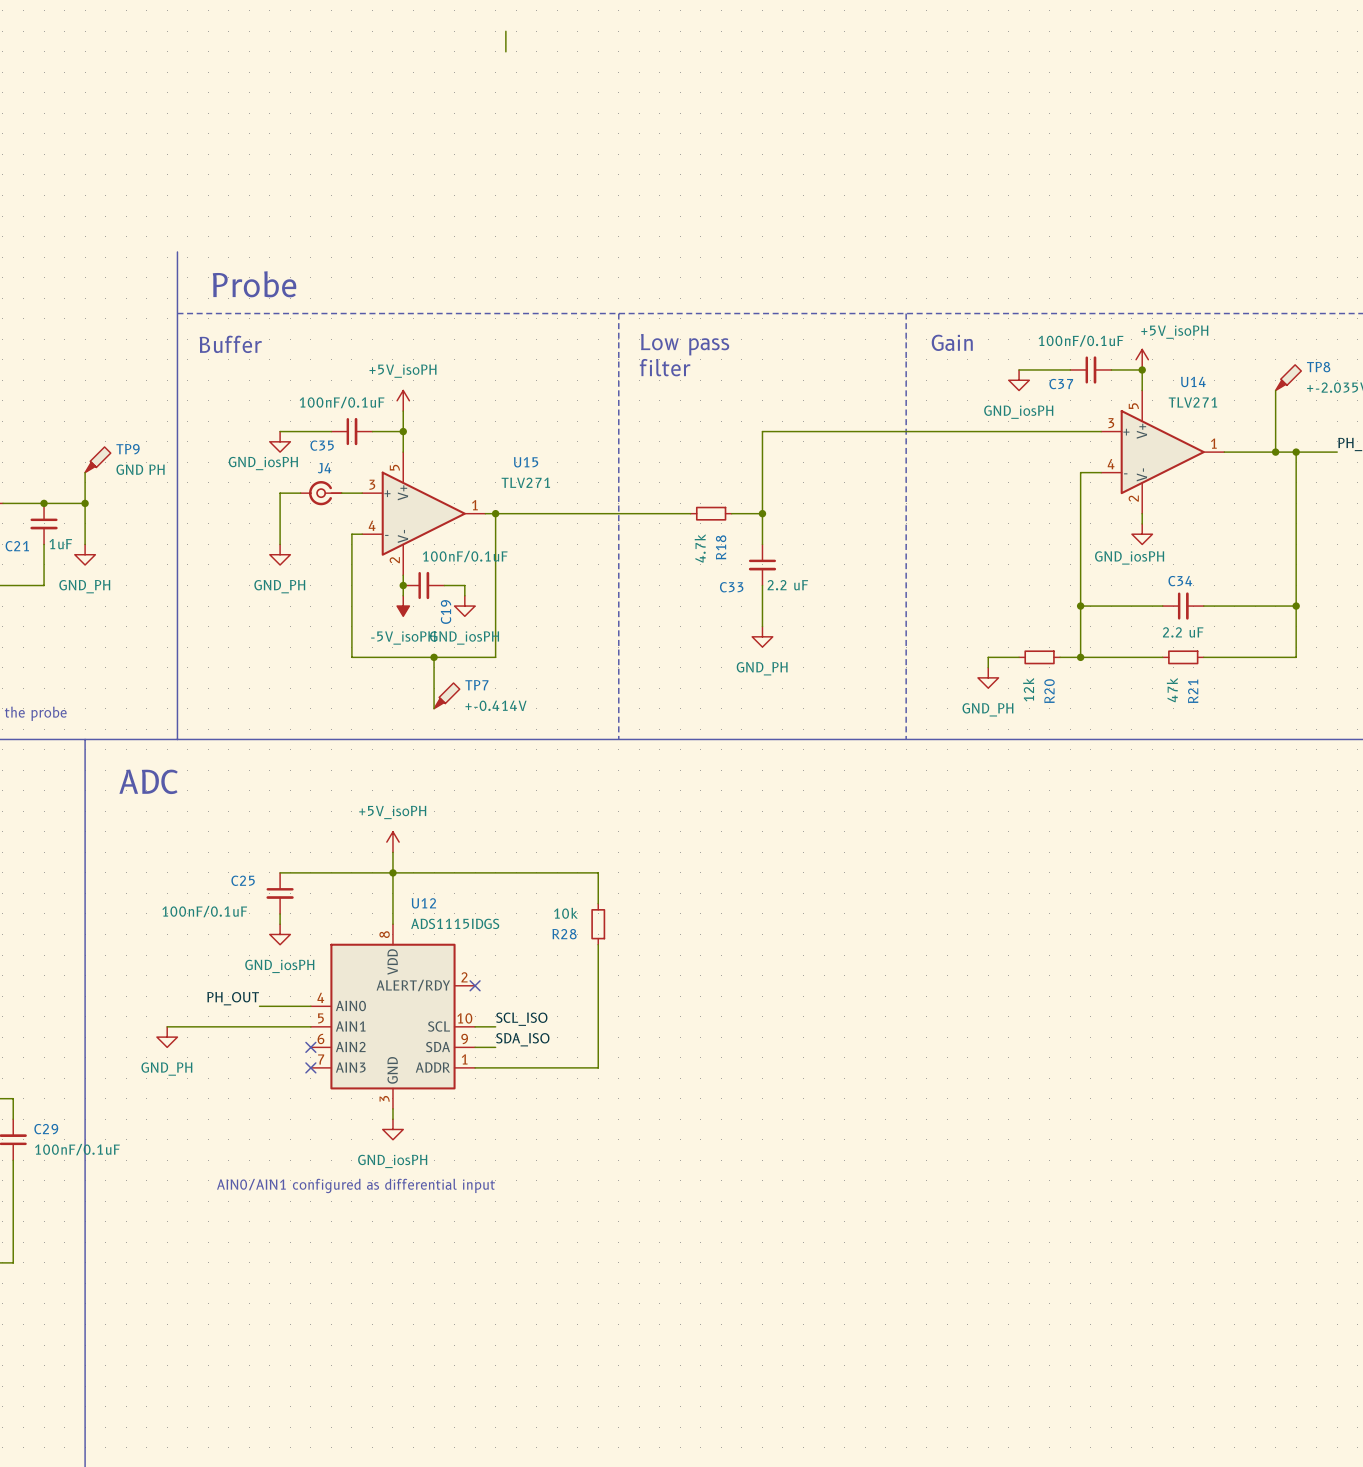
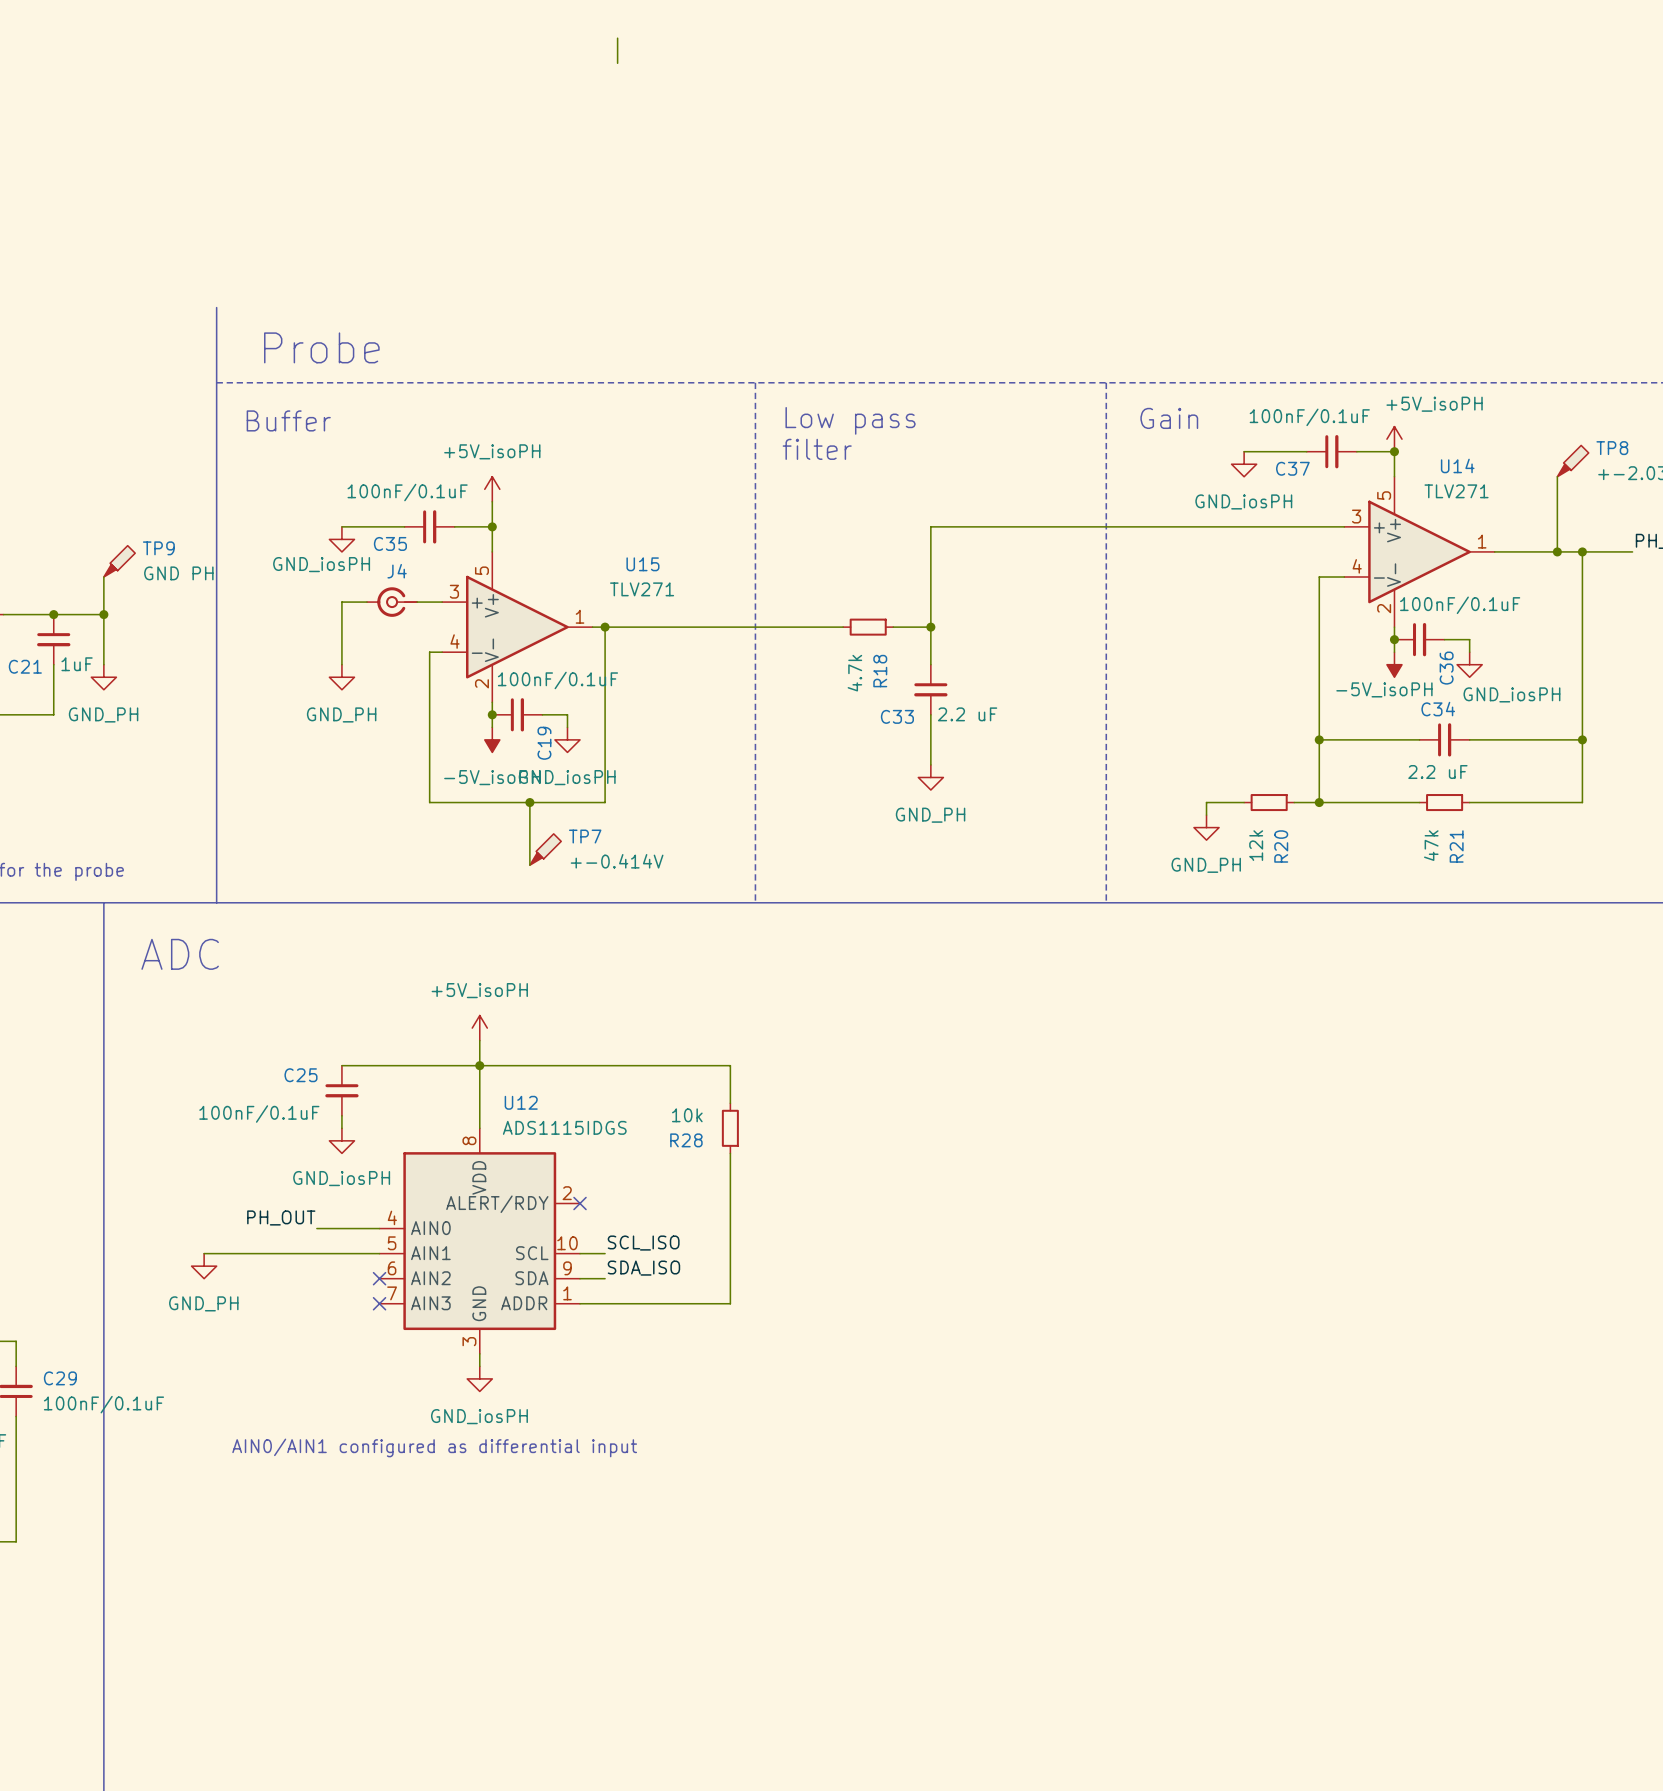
junction: none -> (1394, 639)
C36: none -> 100nF/0.1uF (1419, 639)
wire: none -> (1444, 639) (1469, 639) (1469, 652)
power symbol position: GND_iosPH (1142, 534) -> GND_iosPH (1469, 664)
power symbol: none -> -5V_isoPH (1394, 664)
power symbol text position: GND_iosPH (1129, 557) -> GND_iosPH (1511, 694)

